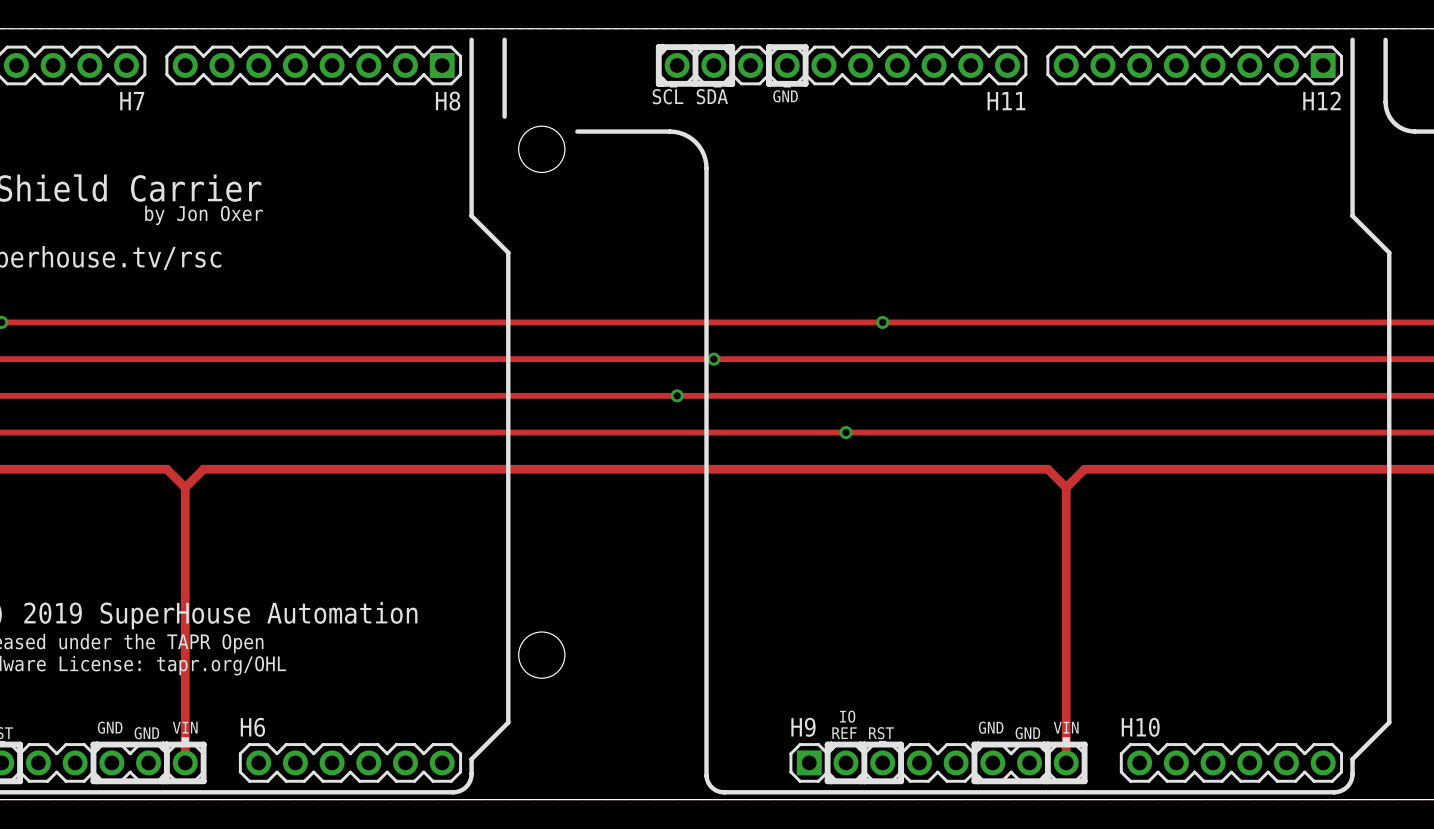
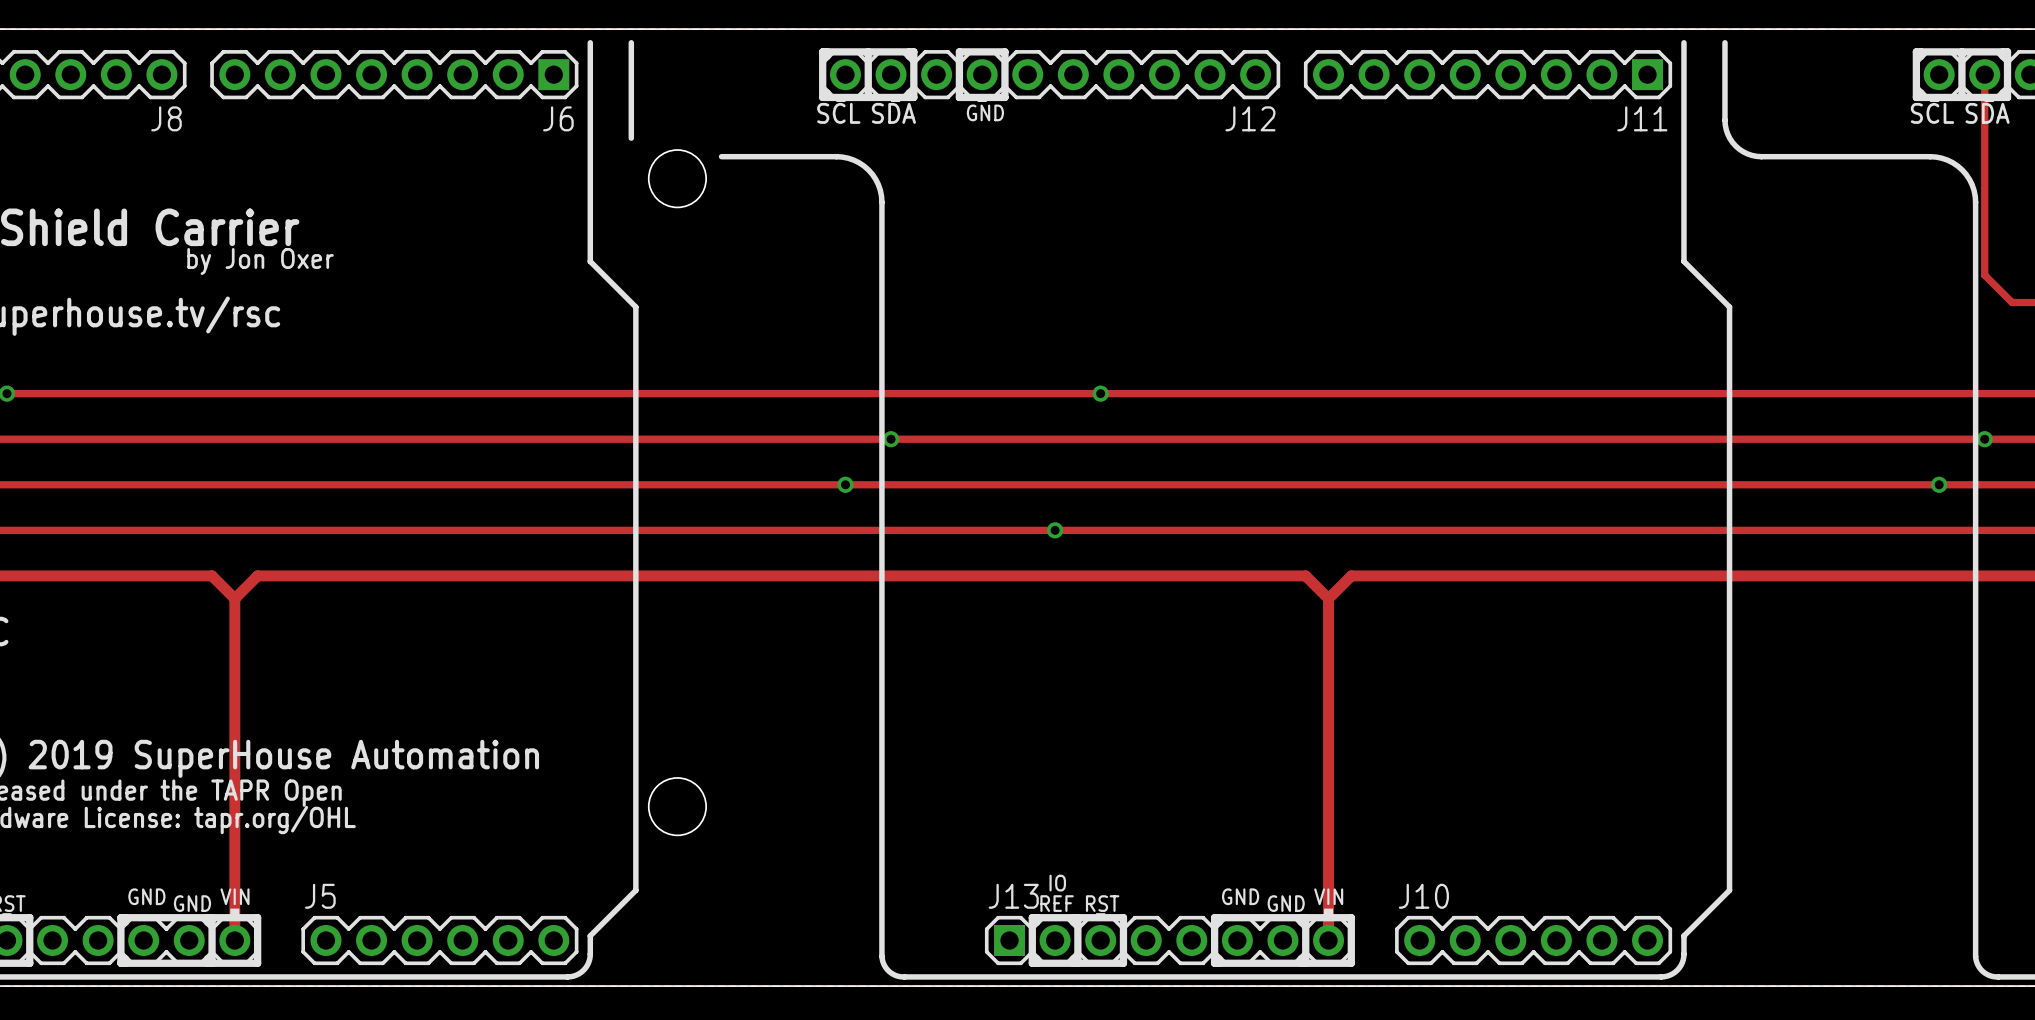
H12 name: H12 (1321, 100) -> J11 (1642, 118)
H7 name: H7 (132, 101) -> J8 (166, 118)
H8 name: H8 (448, 101) -> J6 (558, 118)
H11 name: H11 (1006, 101) -> J12 (1250, 118)
H6 name: H6 (252, 727) -> J5 (320, 896)
H9 name: H9 (803, 727) -> J13 (1013, 896)
H10 name: H10 (1140, 727) -> J10 (1423, 896)

